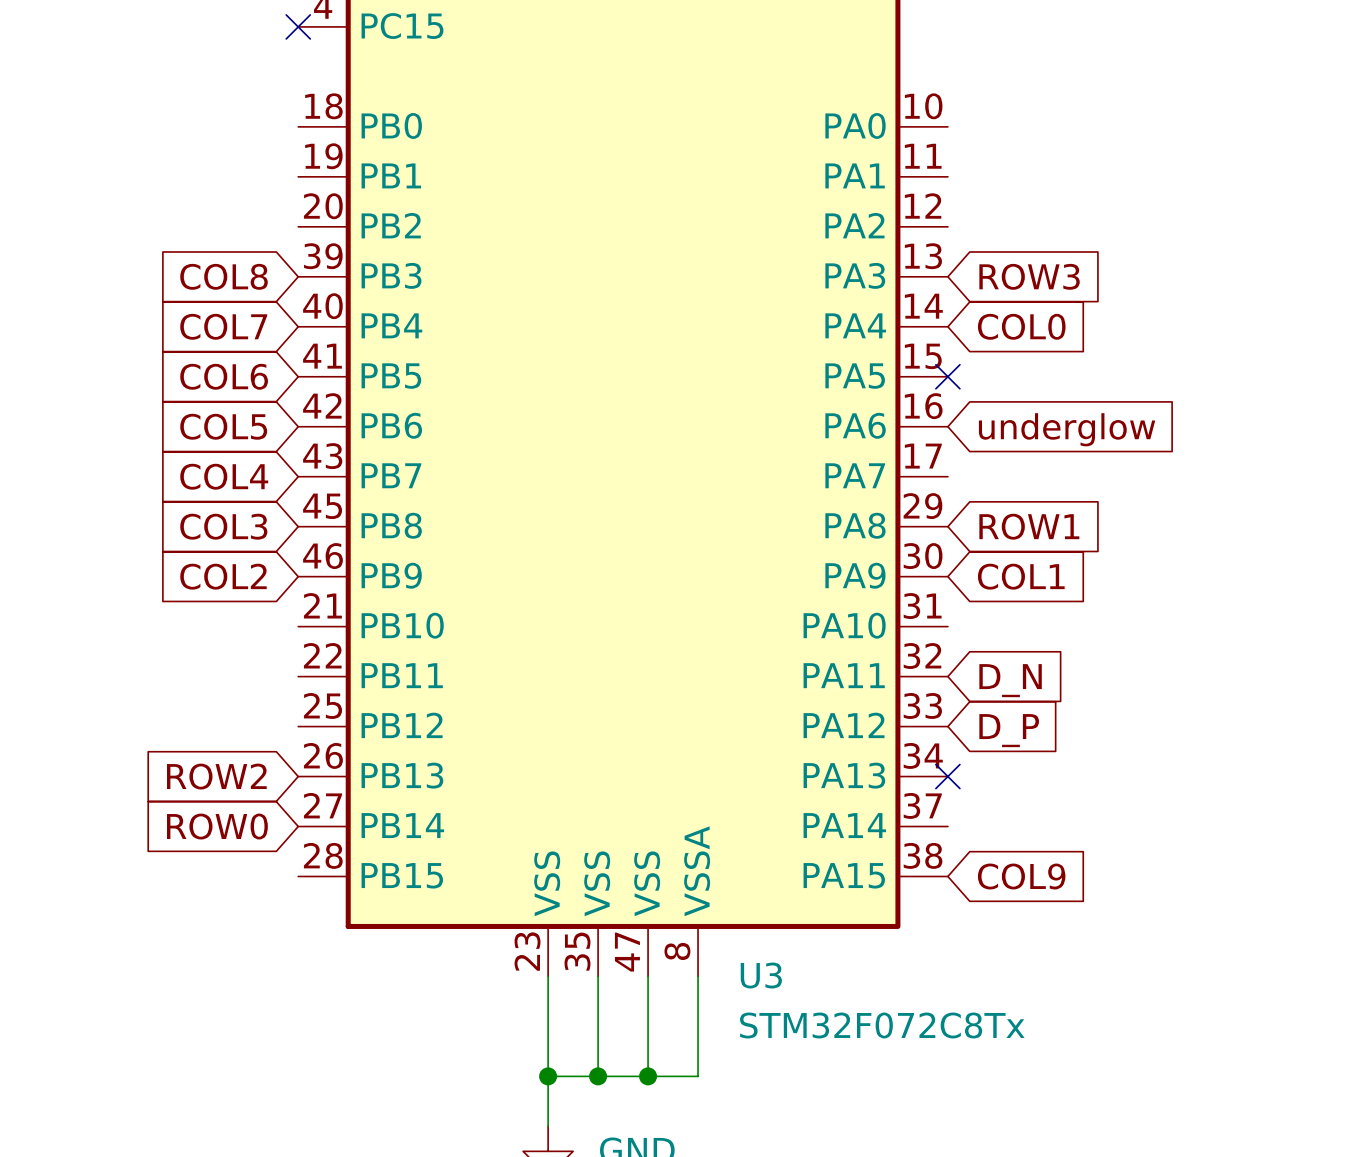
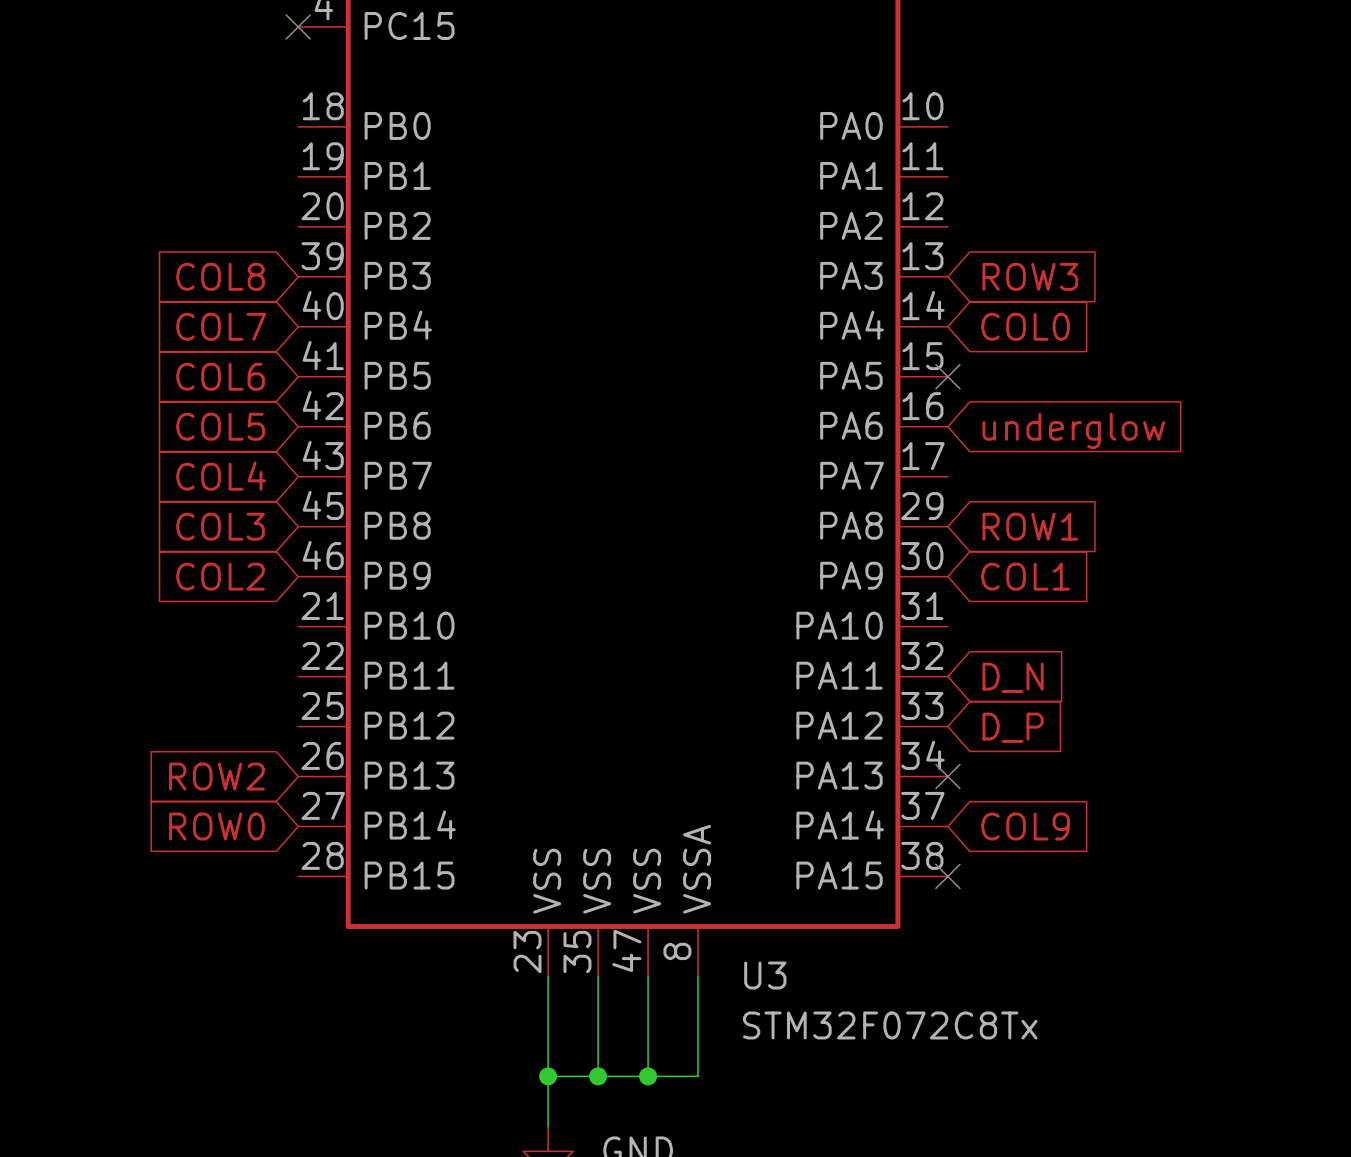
no-connect mark: none -> (947, 876)
global label position: COL9 (1021, 876) -> COL9 (1025, 826)

